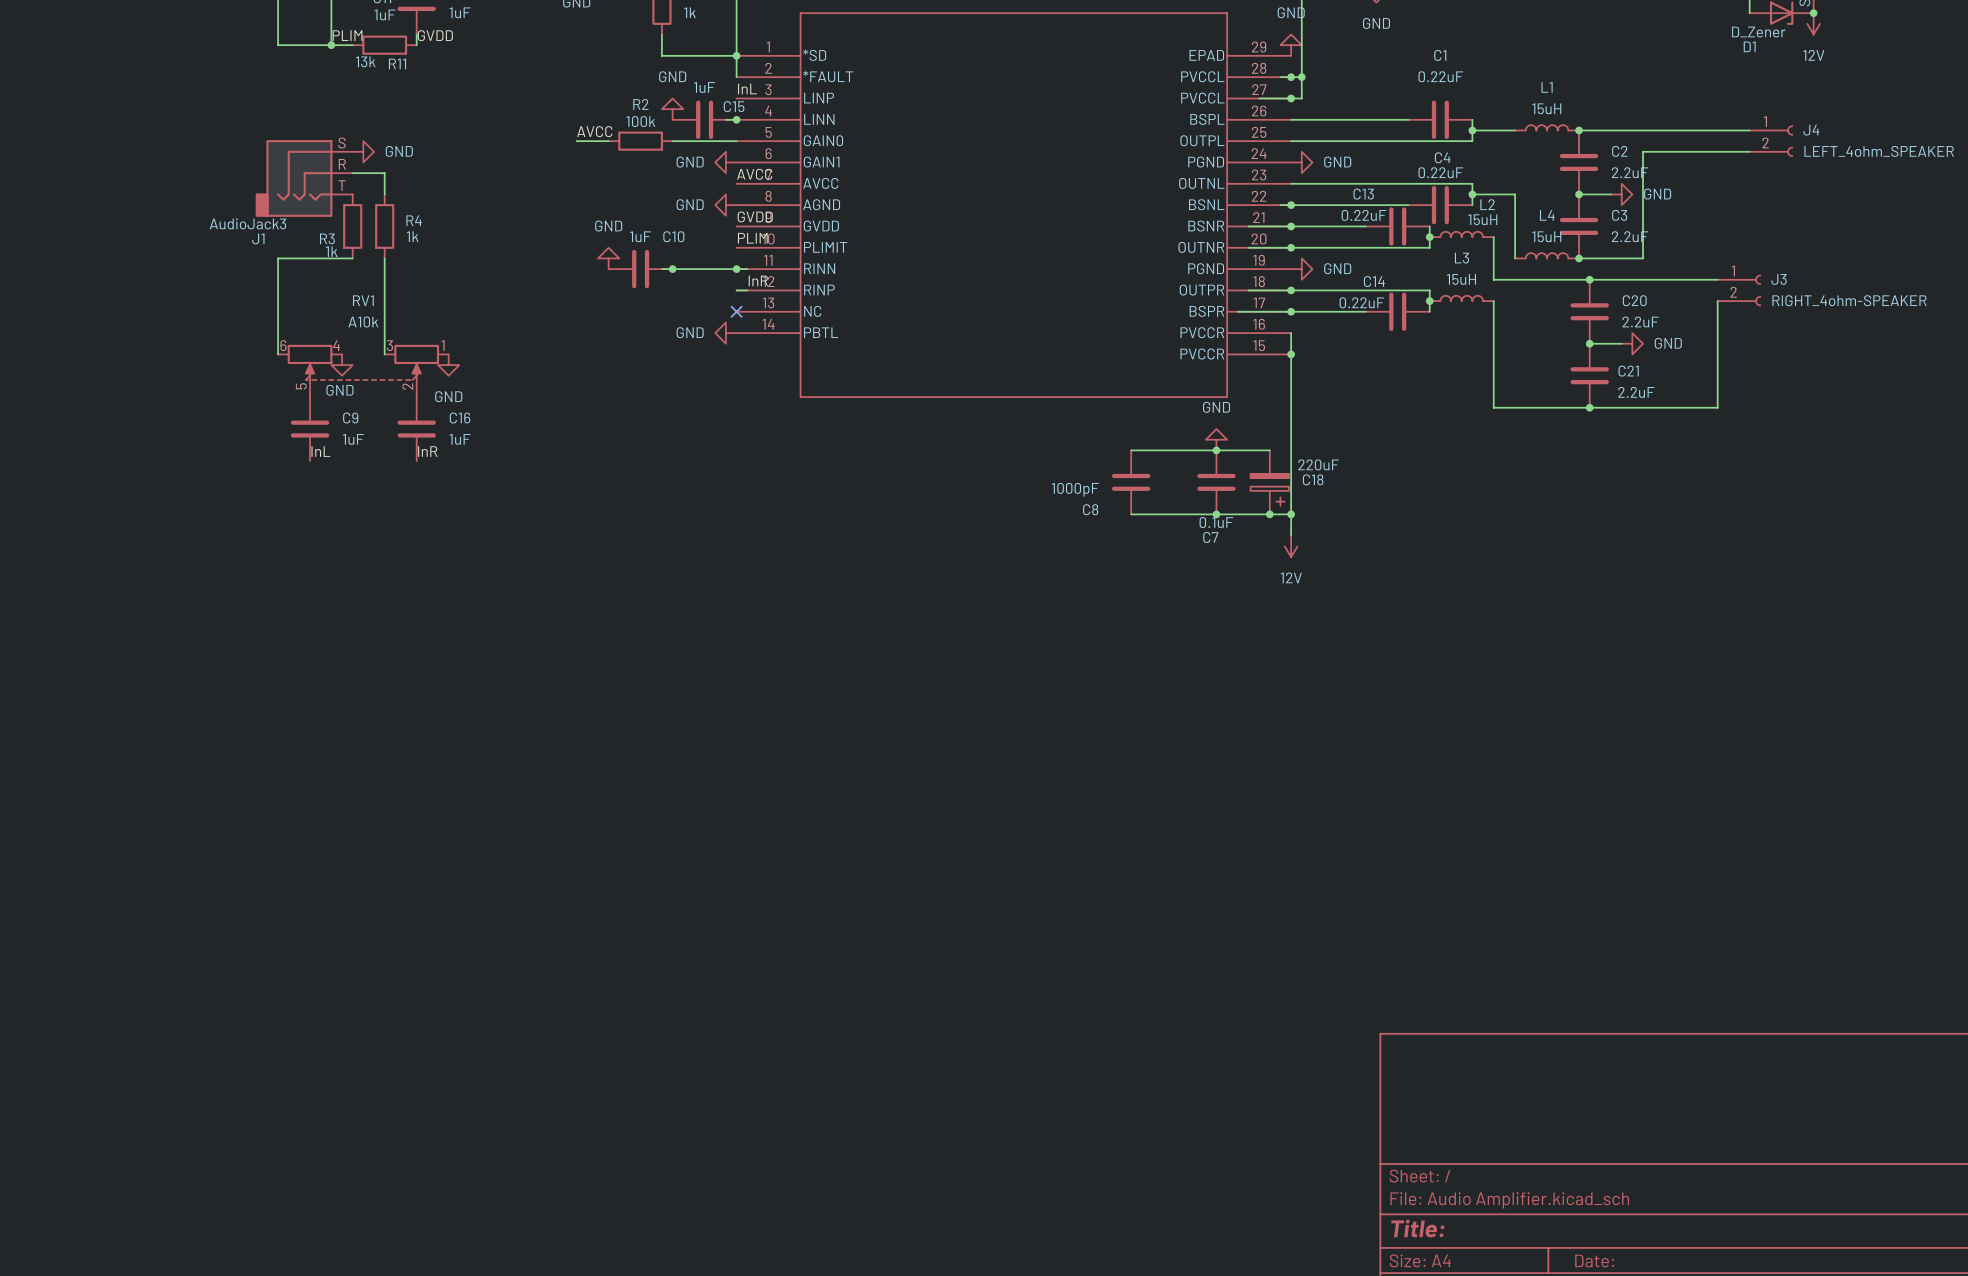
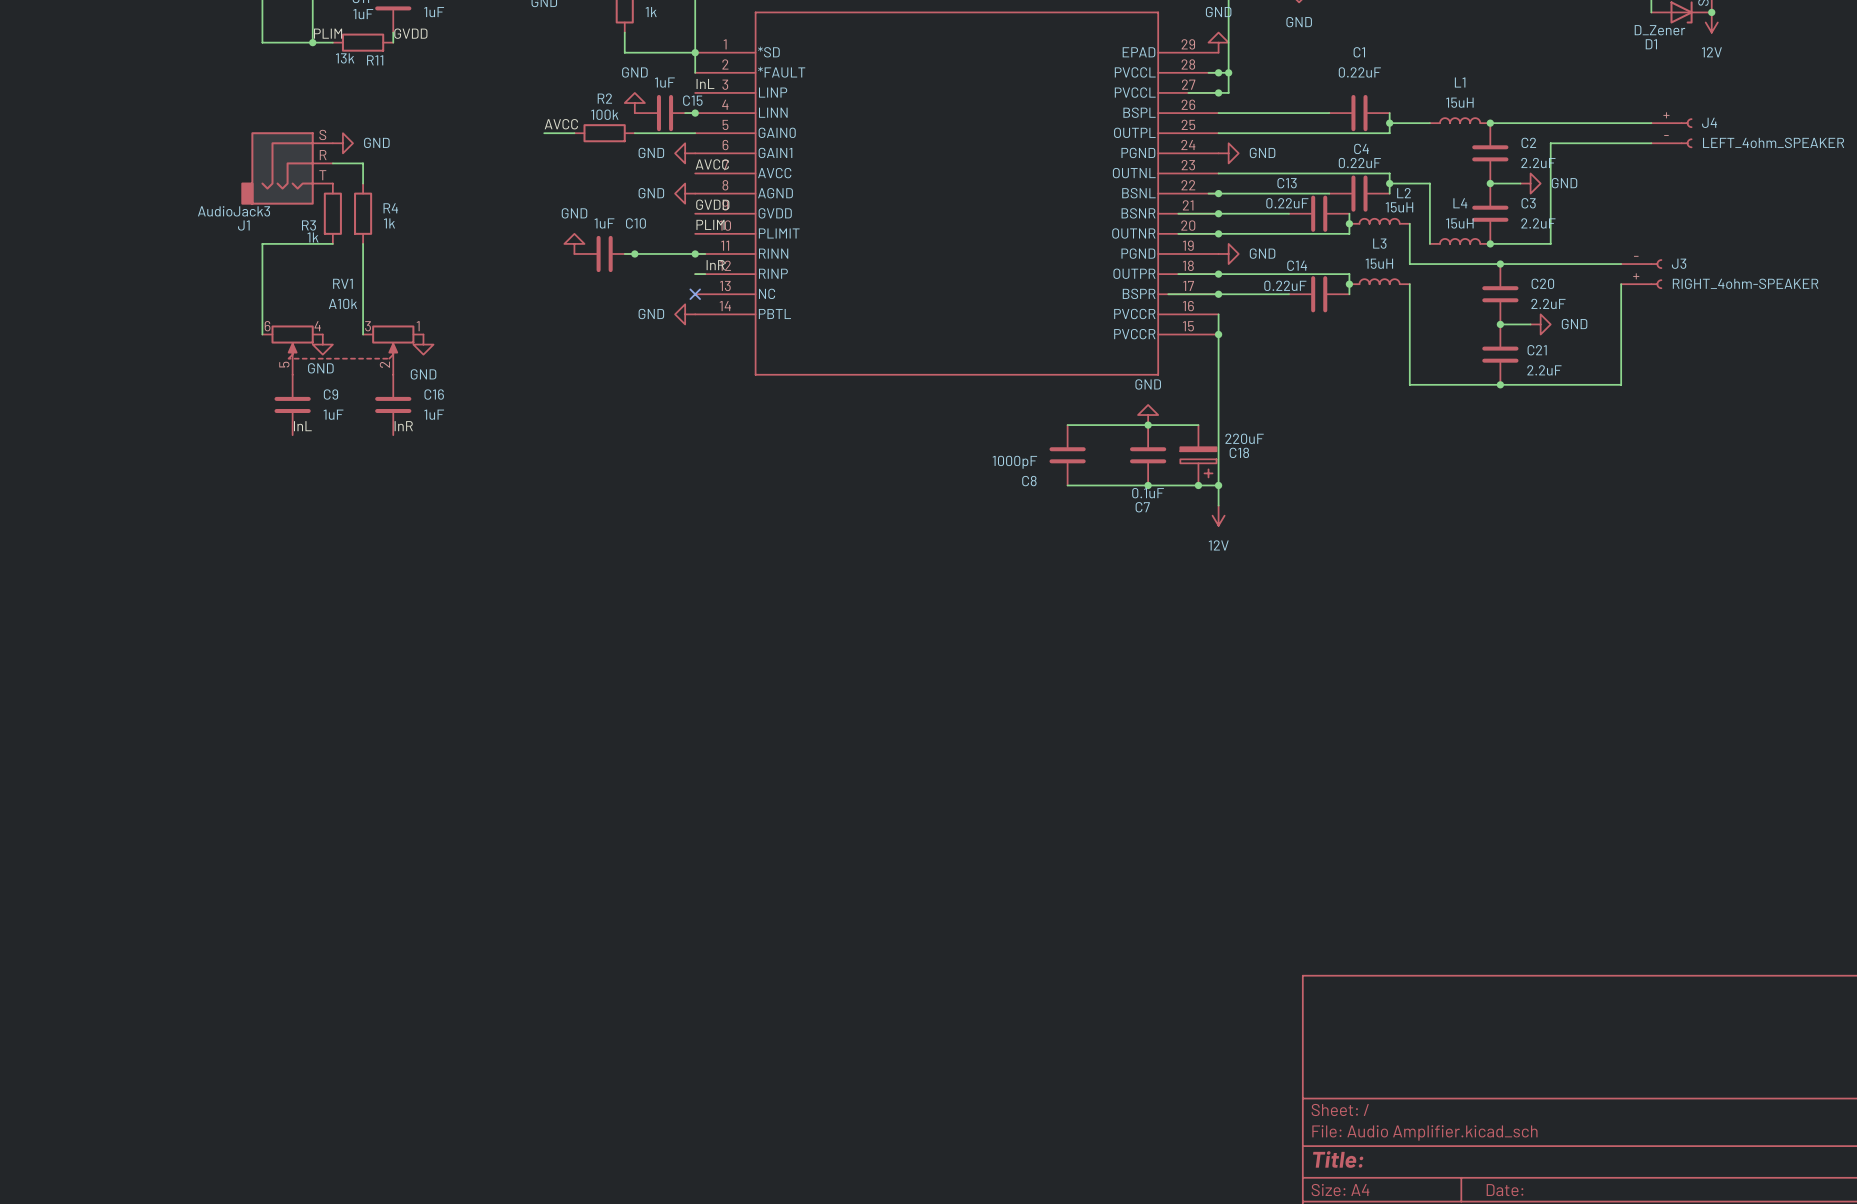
J4 pin number: 1 (1765, 121) -> + (1666, 115)
J4 pin number: 2 (1765, 142) -> - (1666, 135)
J3 pin number: 1 (1733, 270) -> - (1636, 256)
J3 pin number: 2 (1733, 292) -> + (1636, 276)

